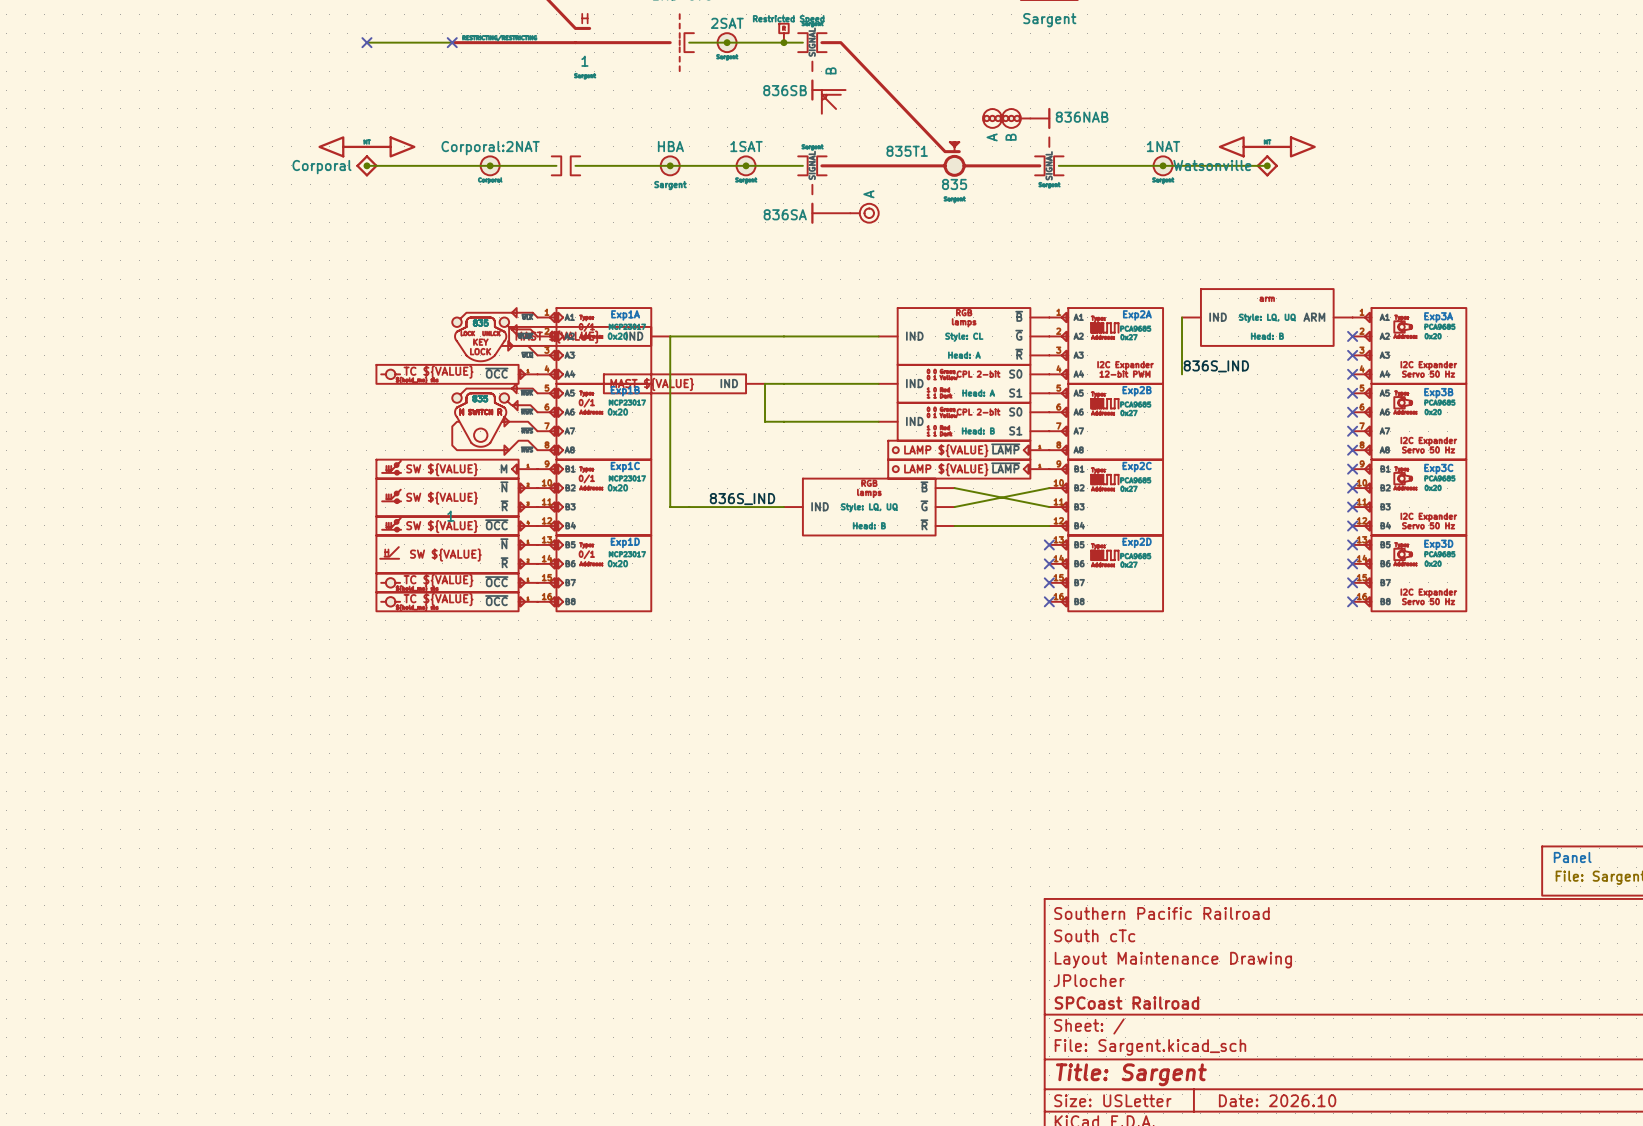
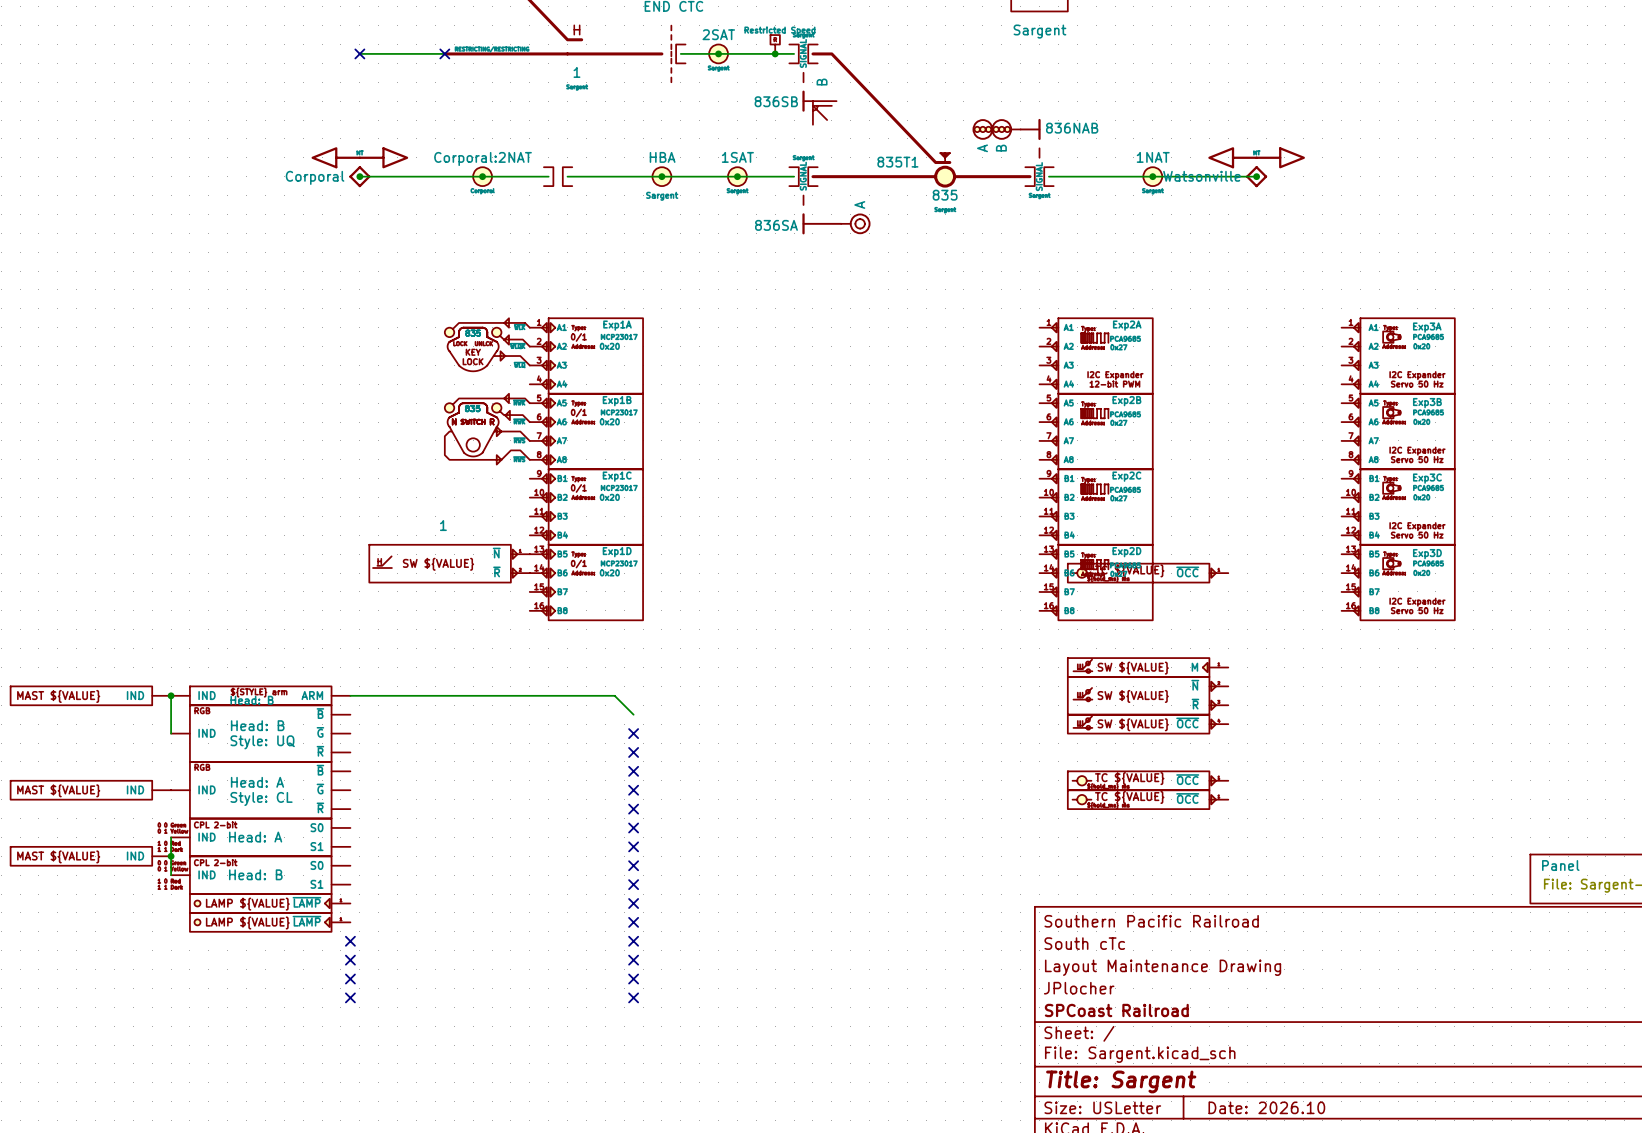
wire: (1182, 317) (1182, 374) -> none
part: (1267, 317) -> none
part: (589, 336) -> none
wire: (878, 336) (670, 336) (670, 507) (783, 507) -> none
part: (964, 336) -> none
no-connect mark: (1352, 336) -> none
no-connect mark: (1352, 355) -> none
label: 836S_IND (1216, 366) -> none
part: (456, 374) -> none
no-connect mark: (1352, 374) -> none
part: (684, 383) -> none
wire: (878, 383) (765, 383) (765, 421) (878, 421) -> none
part: (964, 383) -> none
no-connect mark: (1352, 393) -> none
no-connect mark: (1352, 412) -> none
part: (964, 421) -> none
no-connect mark: (1352, 431) -> none
part: (968, 450) -> none
no-connect mark: (1352, 450) -> none
part: (456, 469) -> none
part: (968, 469) -> none
no-connect mark: (1352, 469) -> none
wire: (954, 488) (1049, 507) -> none
wire: (1049, 488) (954, 507) -> none
no-connect mark: (1352, 488) -> none
part: (456, 497) -> none
label: 836S_IND (742, 499) -> none
part: (869, 507) -> none
no-connect mark: (1352, 507) -> none
part: (456, 525) -> none
wire: (954, 525) (1049, 525) -> none
no-connect mark: (1352, 525) -> none
no-connect mark: (1049, 544) -> none
no-connect mark: (1352, 544) -> none
no-connect mark: (1049, 563) -> none
part: none -> (1148, 573)
no-connect mark: (1352, 563) -> none
part: (456, 582) -> none
no-connect mark: (1049, 582) -> none
no-connect mark: (1352, 582) -> none
part: (456, 601) -> none
no-connect mark: (1049, 601) -> none
no-connect mark: (1352, 601) -> none
part: none -> (1148, 667)
part: none -> (90, 695)
wire: none -> (171, 695) (171, 733)
junction: none -> (171, 695)
part: none -> (260, 695)
wire: none -> (350, 695) (614, 695) (633, 714)
part: none -> (1148, 695)
part: none -> (1148, 724)
part: none -> (260, 733)
no-connect mark: none -> (633, 733)
no-connect mark: none -> (633, 752)
no-connect mark: none -> (633, 771)
part: none -> (1148, 780)
part: none -> (90, 790)
part: none -> (260, 790)
no-connect mark: none -> (633, 790)
part: none -> (1148, 799)
no-connect mark: none -> (633, 809)
no-connect mark: none -> (633, 827)
wire: none -> (171, 837) (171, 875)
part: none -> (260, 837)
no-connect mark: none -> (633, 846)
part: none -> (90, 856)
junction: none -> (171, 856)
no-connect mark: none -> (633, 865)
part: none -> (260, 875)
no-connect mark: none -> (633, 884)
part: none -> (270, 903)
no-connect mark: none -> (633, 903)
part: none -> (270, 922)
no-connect mark: none -> (633, 922)
no-connect mark: none -> (350, 941)
no-connect mark: none -> (633, 941)
no-connect mark: none -> (350, 960)
no-connect mark: none -> (633, 960)
no-connect mark: none -> (350, 979)
no-connect mark: none -> (633, 979)
no-connect mark: none -> (350, 997)
no-connect mark: none -> (633, 997)

